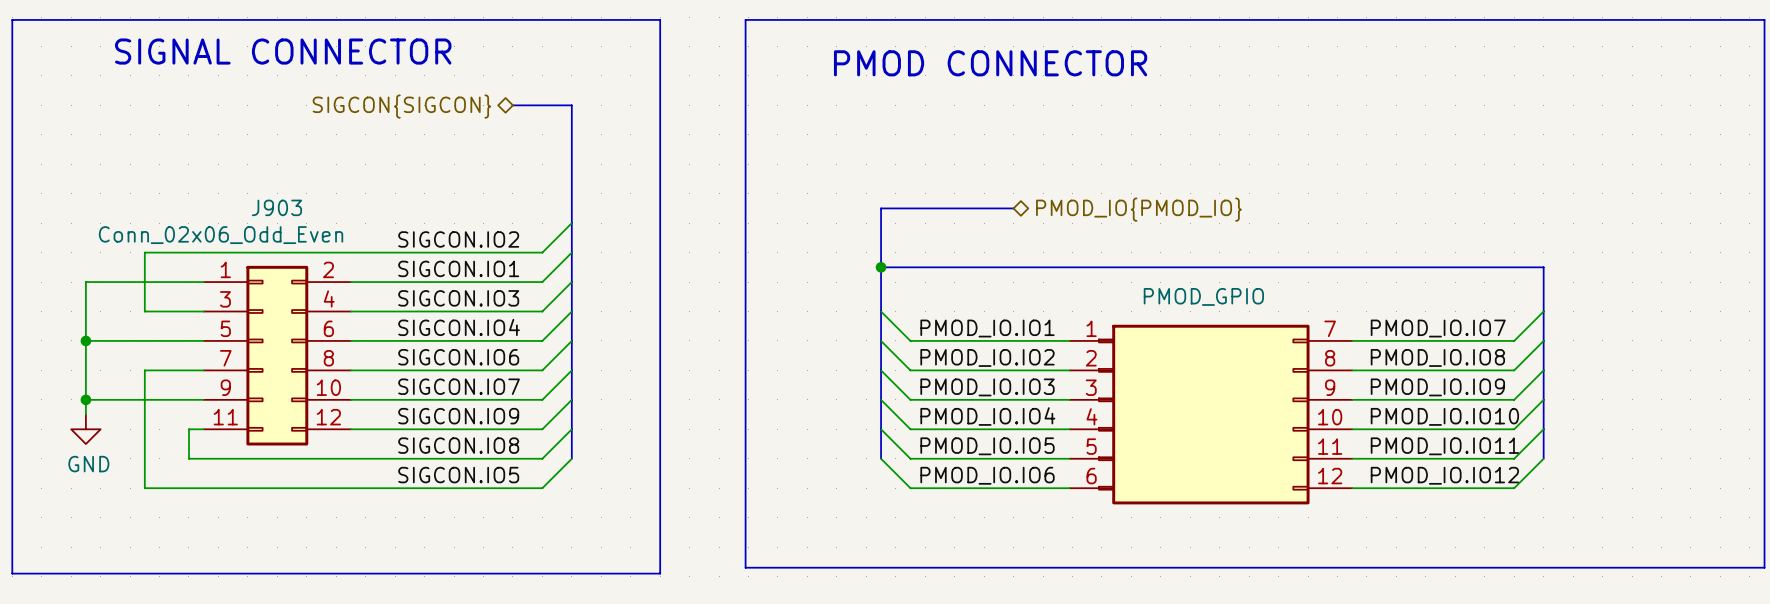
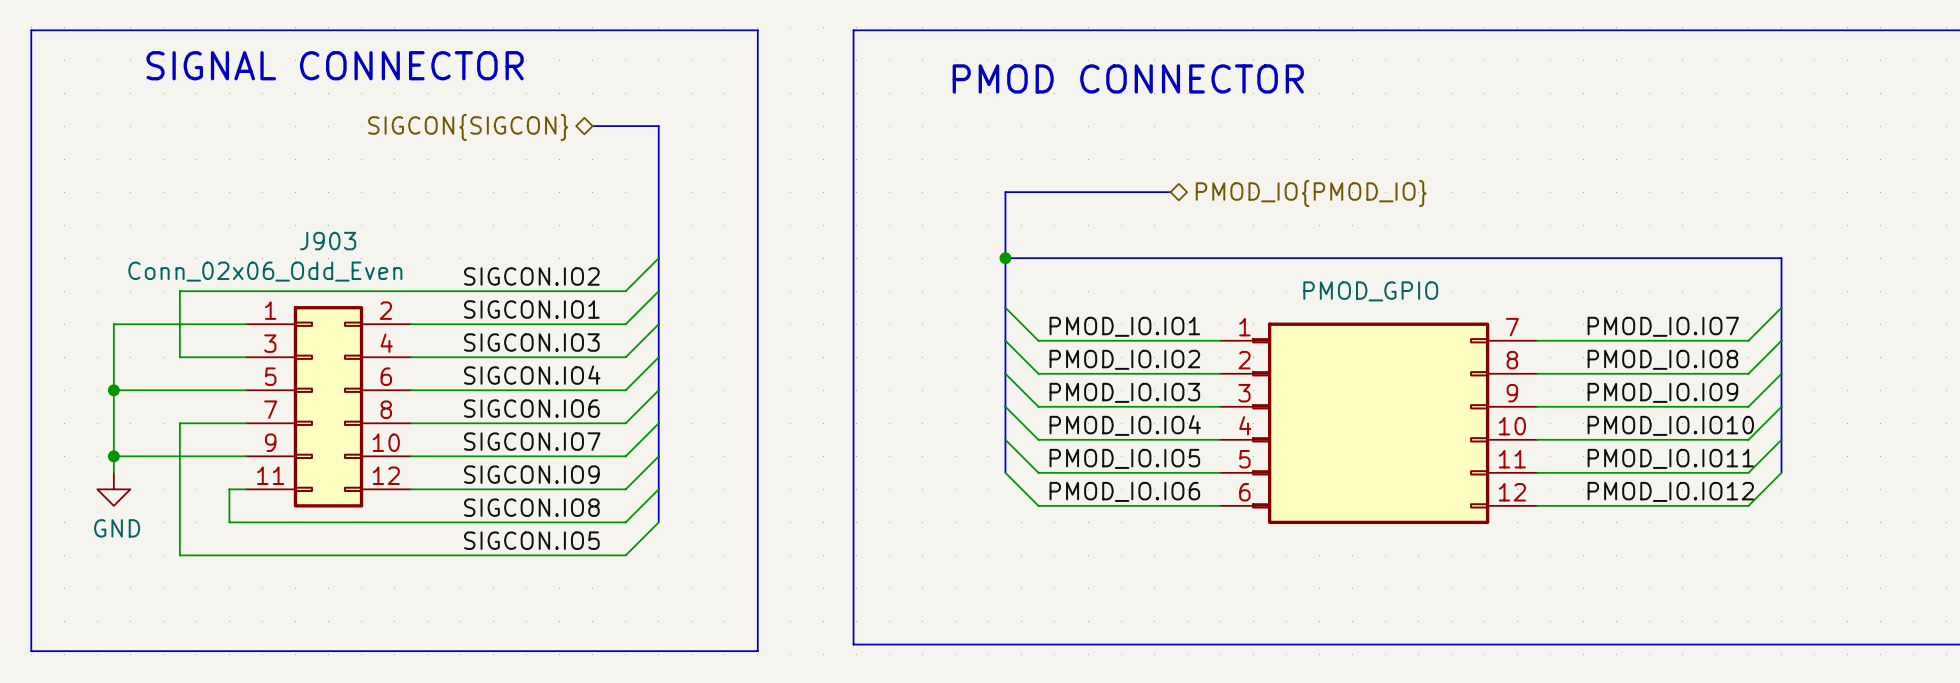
bus: (881, 208) (1013, 208) -> (1005, 241) (1005, 192) (1170, 192)
hierarchical label position: PMOD_IO{PMOD_IO} (1138, 209) -> PMOD_IO{PMOD_IO} (1311, 193)
bus: none -> (1005, 258) (1781, 258) (1781, 472)
wire: none -> (1005, 307) (1038, 340) (1220, 340)
bus: (881, 267) (1543, 267) (1543, 458) -> none
junction position: (881, 267) -> (1005, 258)
wire: none -> (1781, 307) (1748, 340) (1537, 340)
wire: none -> (1005, 340) (1038, 373) (1220, 373)
wire: none -> (1781, 340) (1748, 373) (1537, 373)
wire: (881, 311) (910, 340) (1069, 340) -> none
wire: (1543, 311) (1514, 340) (1352, 340) -> none
wire: none -> (1005, 373) (1038, 406) (1220, 406)
wire: none -> (1781, 373) (1748, 406) (1537, 406)
label position: PMOD_IO.IO1 (987, 328) -> PMOD_IO.IO1 (1124, 326)
label position: PMOD_IO.IO7 (1438, 328) -> PMOD_IO.IO7 (1663, 326)
wire: (881, 340) (910, 370) (1069, 370) -> none
wire: (1543, 340) (1514, 370) (1352, 370) -> none
wire: none -> (1005, 406) (1038, 439) (1220, 439)
wire: none -> (1781, 406) (1748, 439) (1537, 439)
label position: PMOD_IO.IO2 (987, 357) -> PMOD_IO.IO2 (1124, 359)
label position: PMOD_IO.IO8 (1437, 357) -> PMOD_IO.IO8 (1662, 359)
wire: (881, 370) (910, 399) (1069, 399) -> none
wire: (1543, 370) (1514, 399) (1352, 399) -> none
wire: none -> (1005, 439) (1038, 472) (1220, 472)
wire: none -> (1781, 439) (1748, 472) (1537, 472)
label position: PMOD_IO.IO3 (987, 387) -> PMOD_IO.IO3 (1124, 392)
label position: PMOD_IO.IO9 (1437, 387) -> PMOD_IO.IO9 (1662, 392)
wire: (881, 399) (910, 429) (1069, 429) -> none
wire: (1543, 399) (1514, 429) (1352, 429) -> none
wire: none -> (1005, 472) (1038, 505) (1220, 505)
bus: (881, 414) (881, 458) -> none
part position: (1210, 414) -> (1378, 423)
wire: none -> (1781, 472) (1748, 505) (1537, 505)
label position: PMOD_IO.IO4 (987, 416) -> PMOD_IO.IO4 (1125, 425)
label position: PMOD_IO.IO10 (1444, 416) -> PMOD_IO.IO10 (1670, 425)
wire: (881, 429) (910, 458) (1069, 458) -> none
wire: (1543, 429) (1514, 458) (1352, 458) -> none
label position: PMOD_IO.IO5 (987, 446) -> PMOD_IO.IO5 (1124, 458)
label position: PMOD_IO.IO11 (1444, 446) -> PMOD_IO.IO11 (1670, 458)
wire: (881, 458) (910, 488) (1069, 488) -> none
wire: (1543, 458) (1514, 488) (1352, 488) -> none
label position: PMOD_IO.IO6 (987, 475) -> PMOD_IO.IO6 (1124, 491)
label position: PMOD_IO.IO12 (1444, 475) -> PMOD_IO.IO12 (1670, 491)

